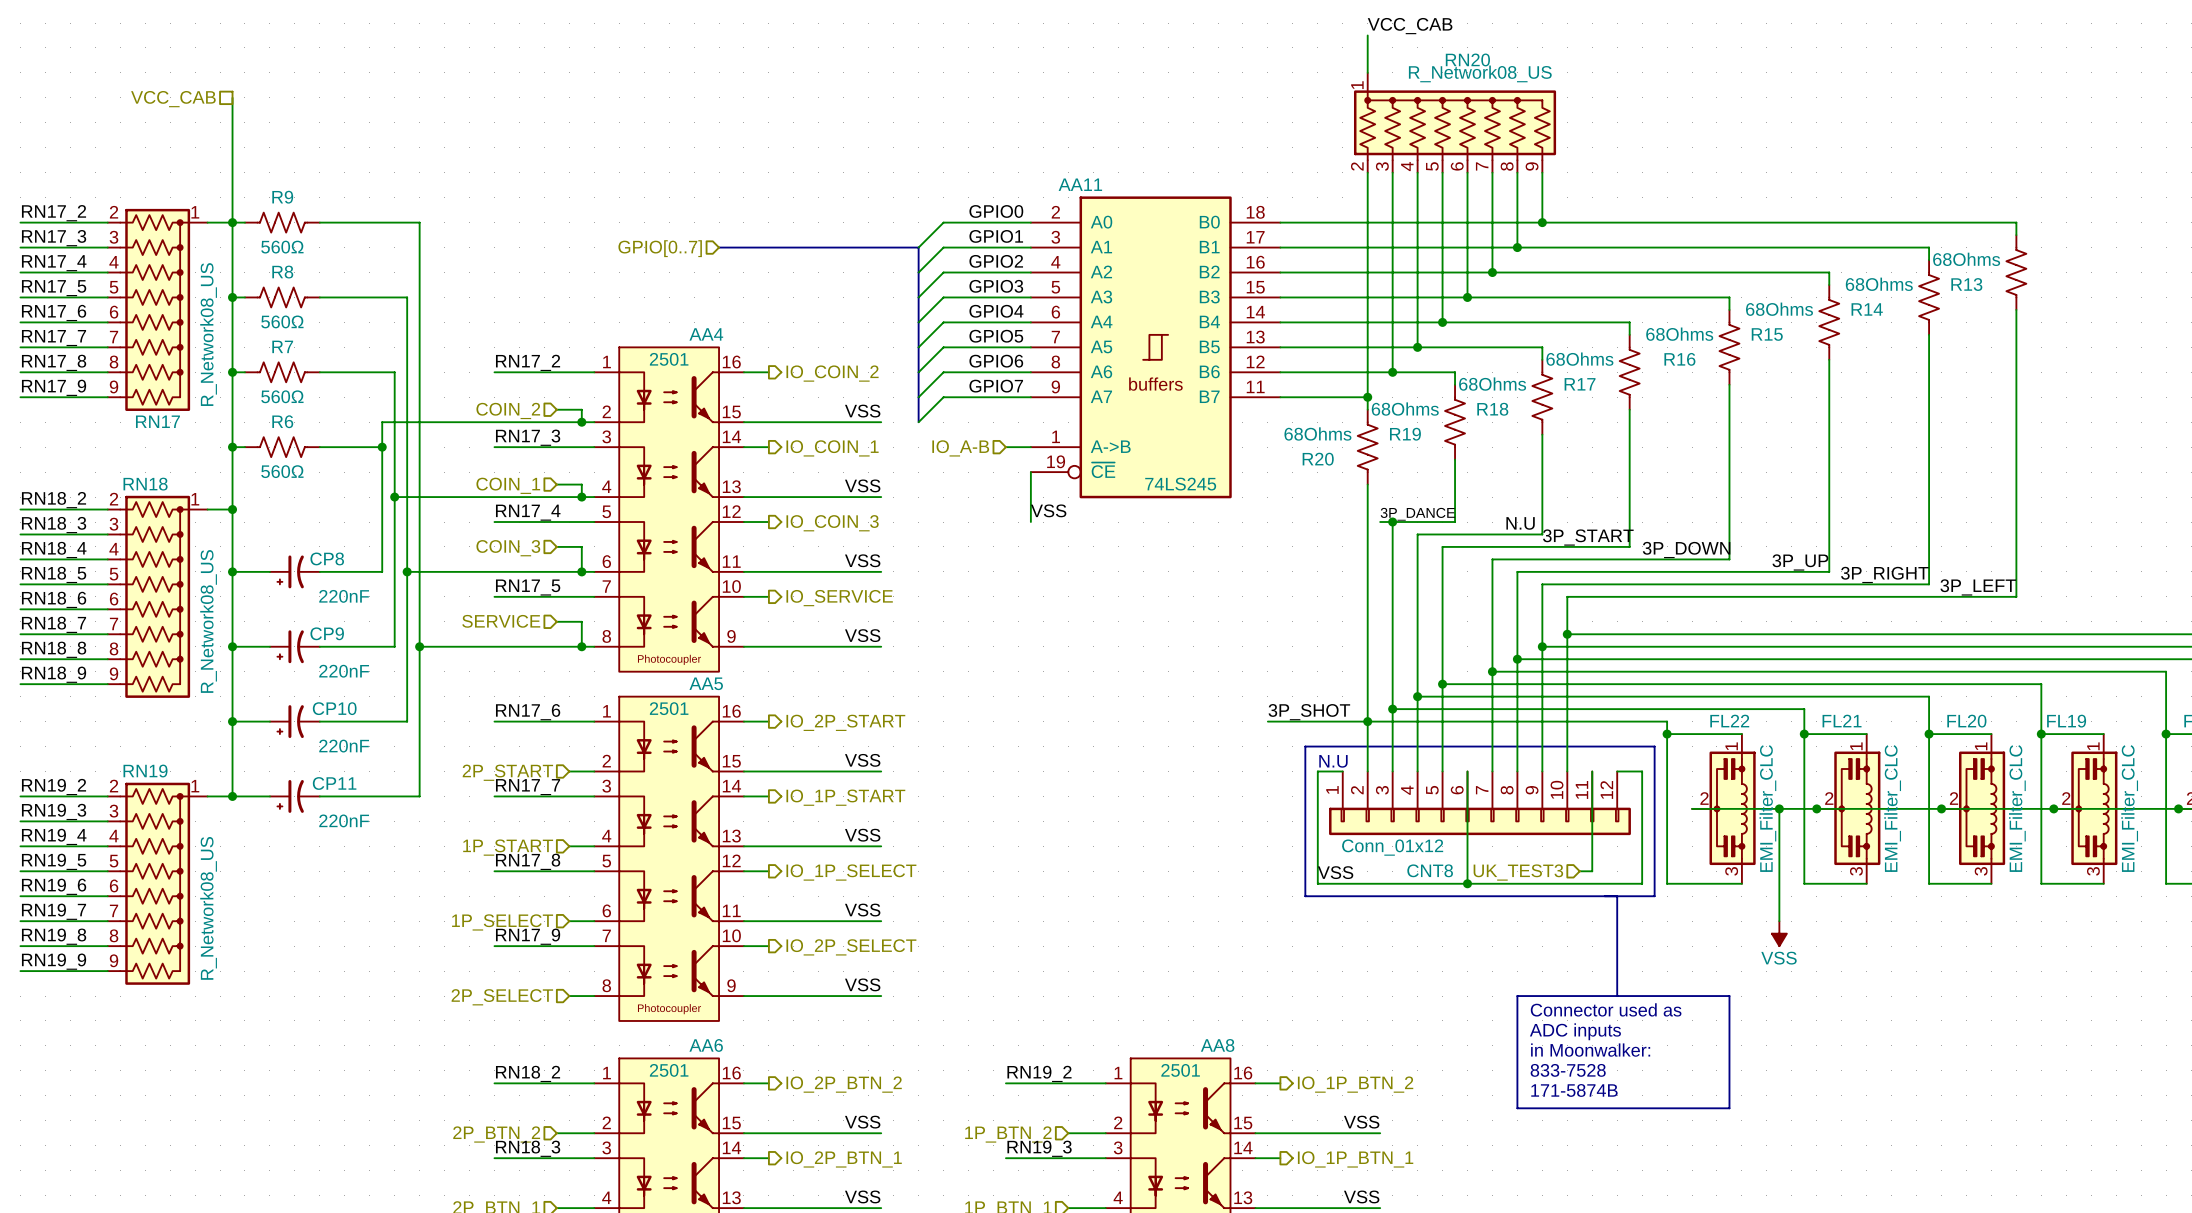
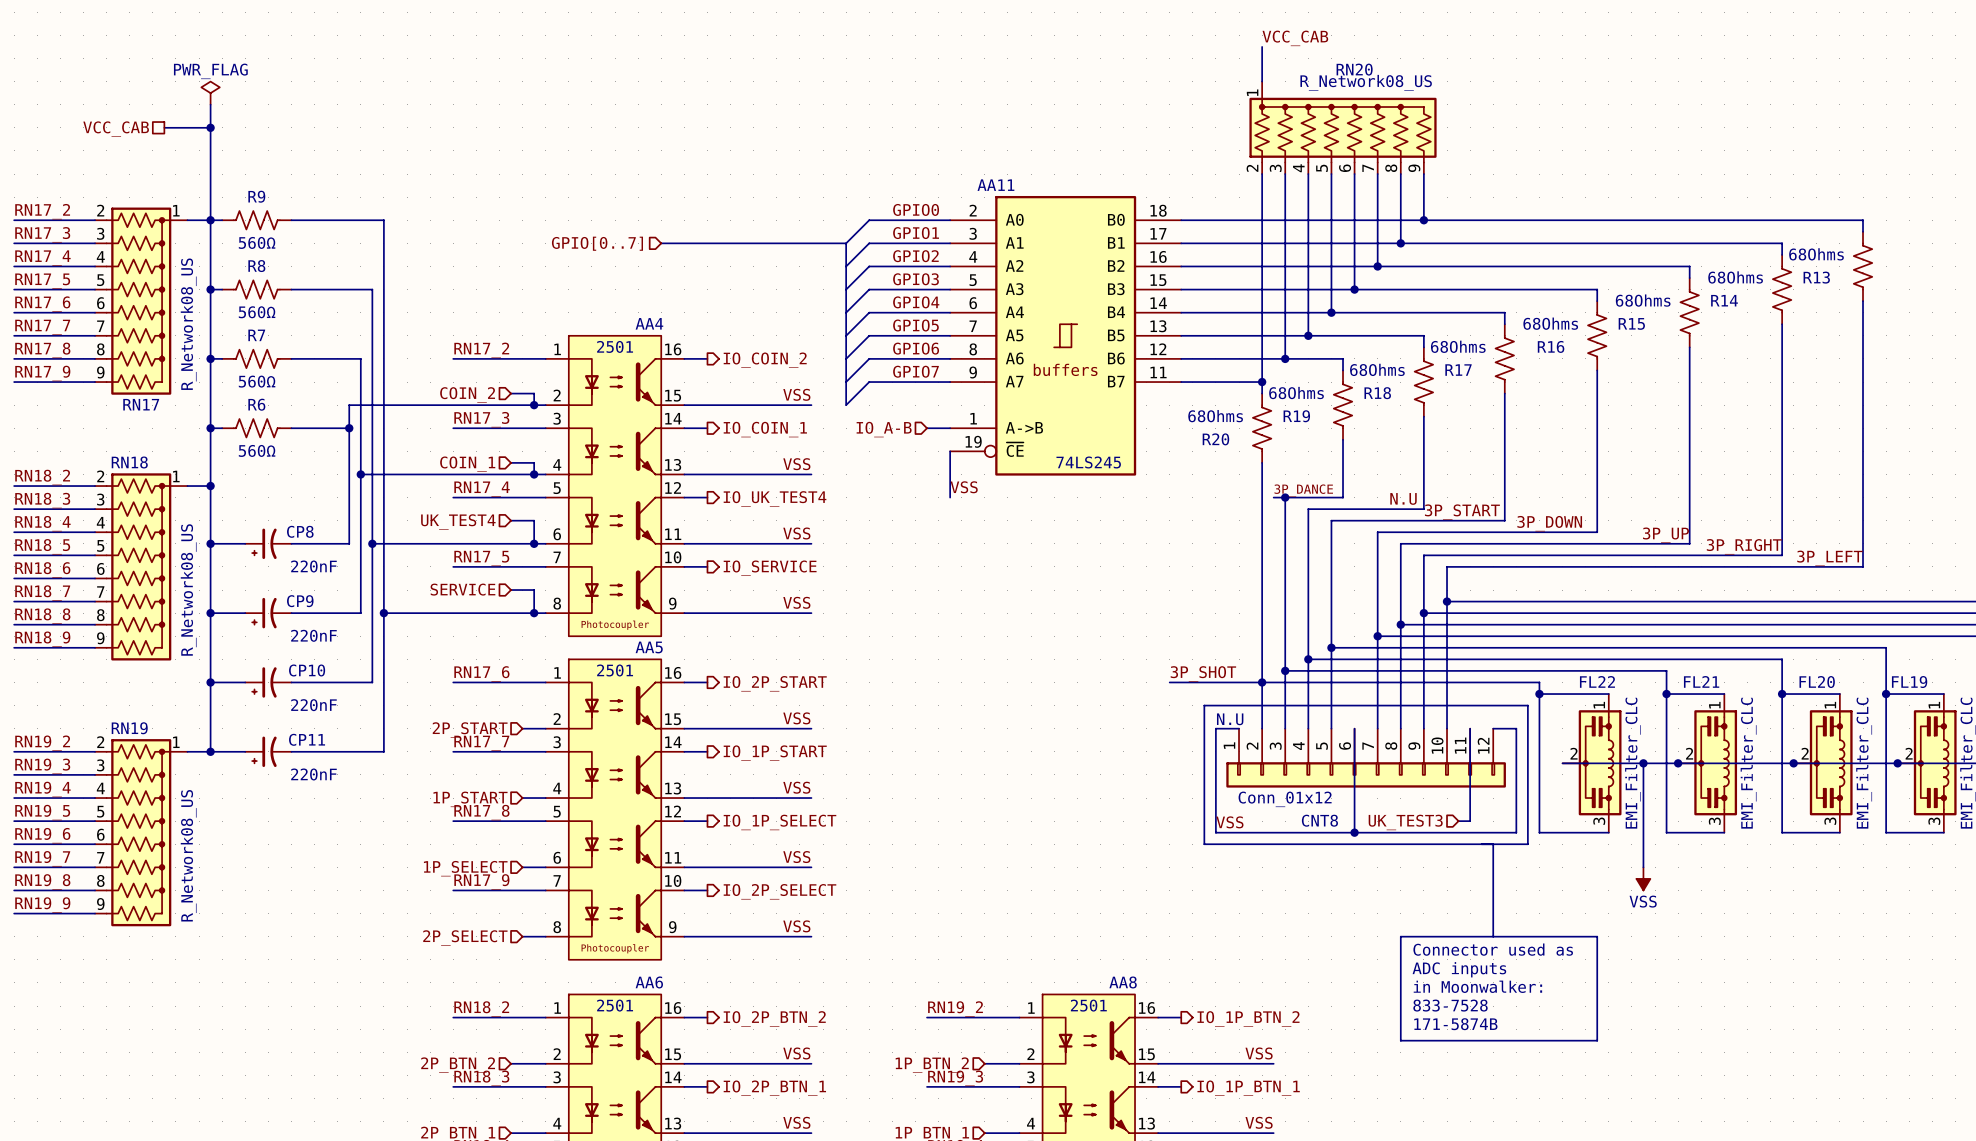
power symbol: none -> PWR_FLAG (210, 93)
hierarchical label position: VCC_CAB (173, 99) -> VCC_CAB (116, 129)
wire: none -> (164, 127) (210, 127)
junction: none -> (210, 127)
hierarchical label: IO_COIN_3 (832, 523) -> IO_UK_TEST4 (775, 498)
hierarchical label: COIN_3 (508, 548) -> UK_TEST4 (458, 522)

